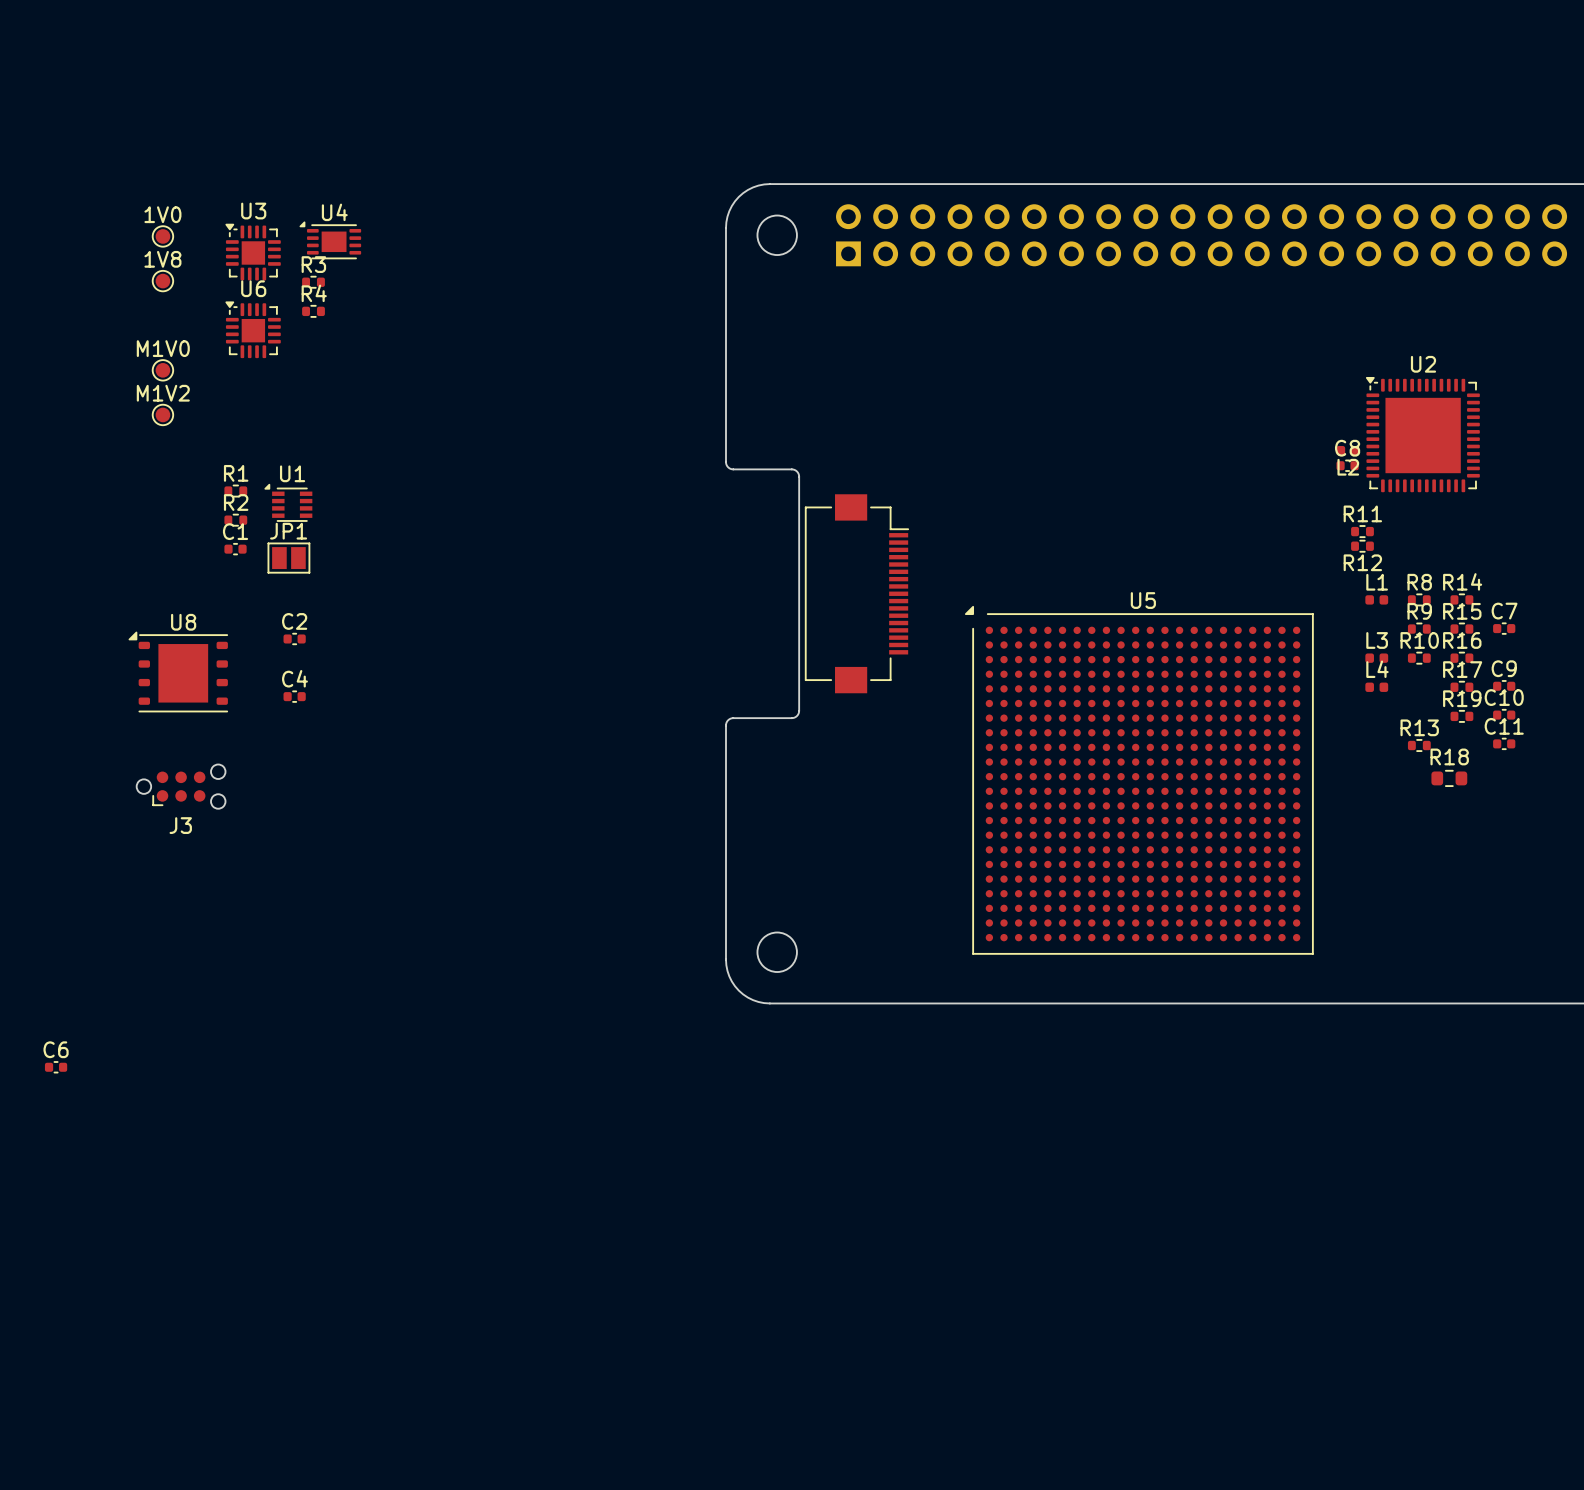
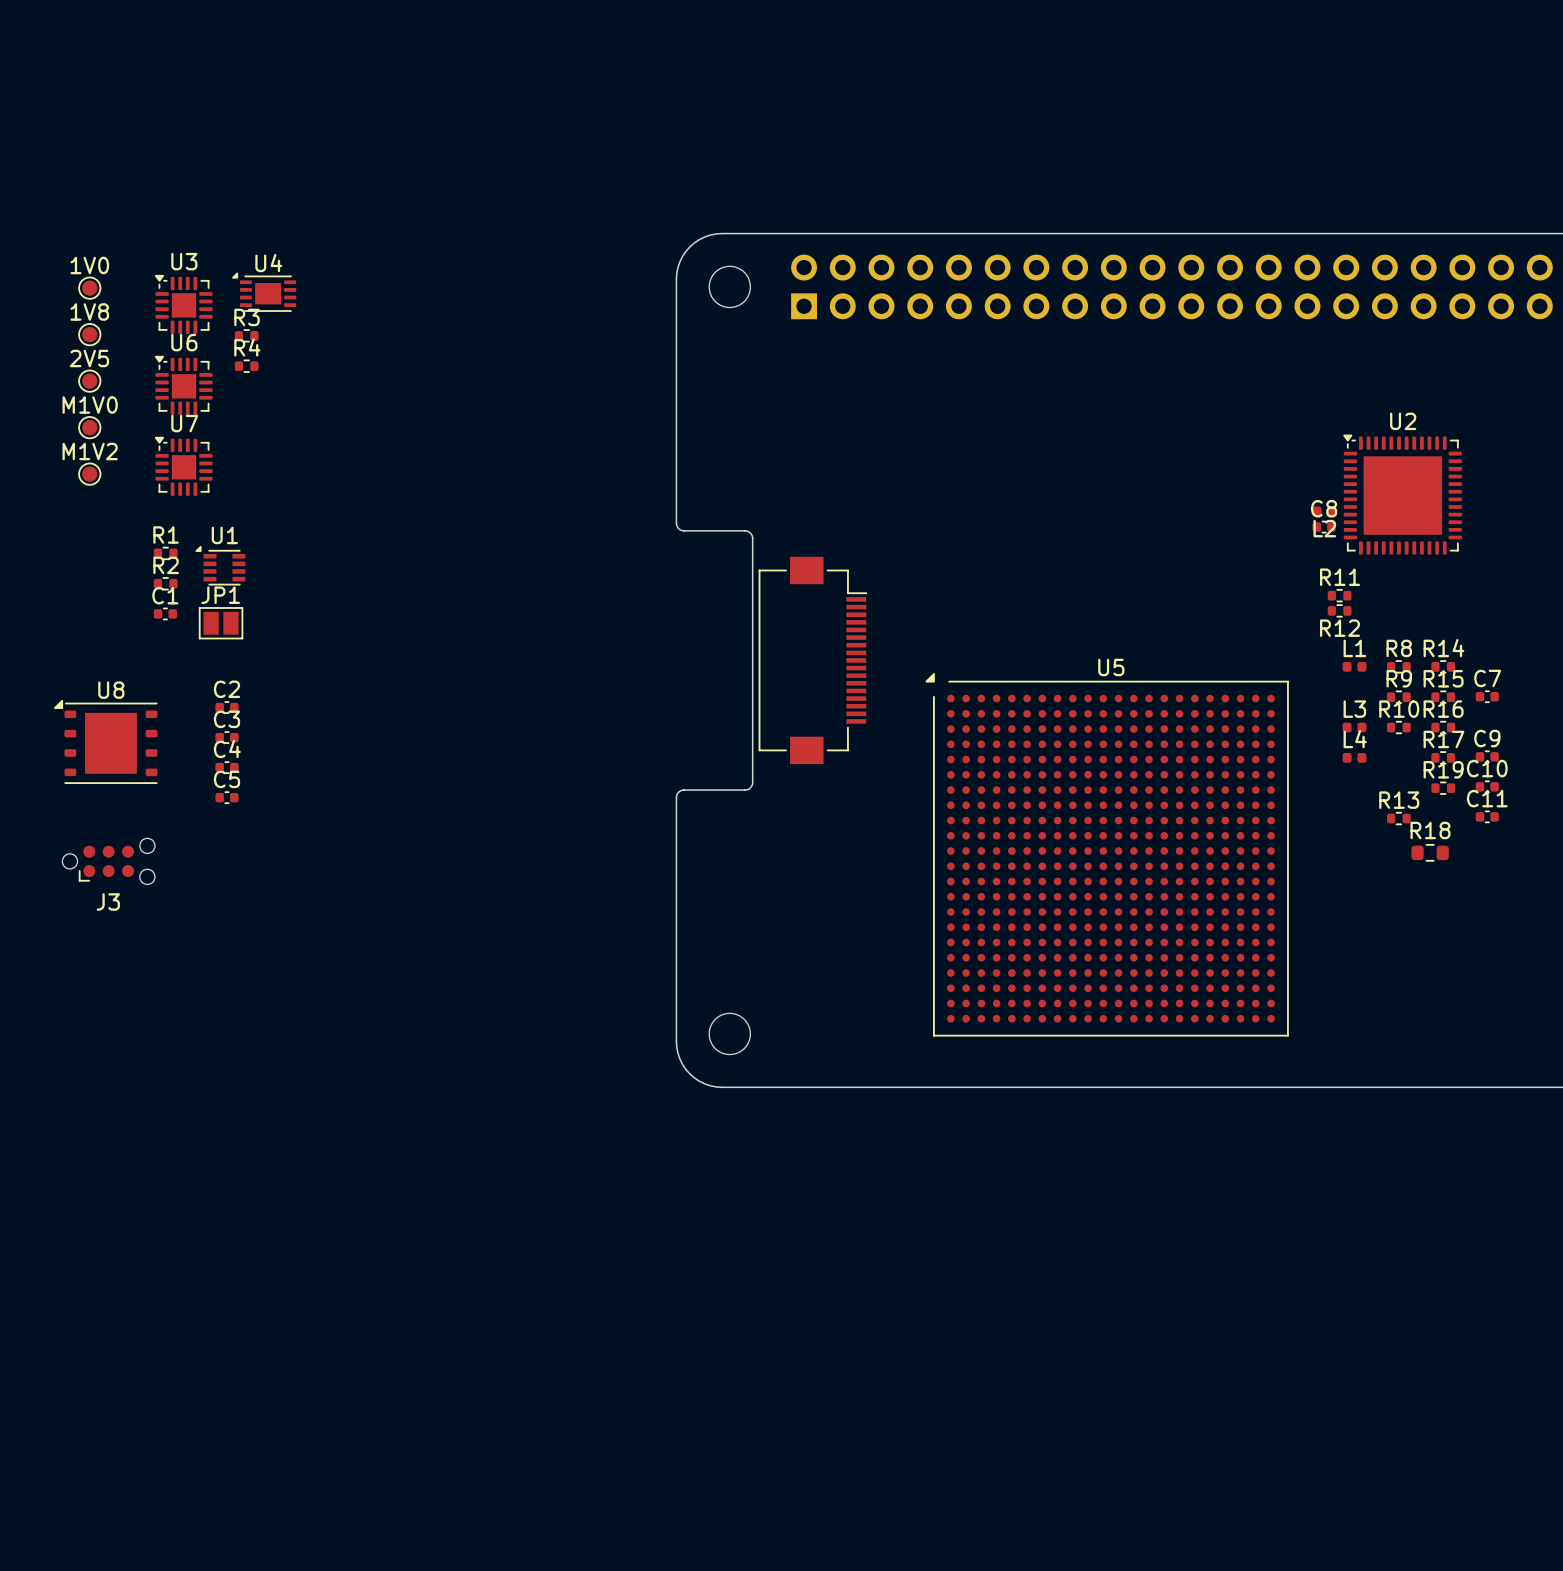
2V5: none -> (89, 381)
U7: none -> (183, 466)
C3: none -> (226, 737)
C5: none -> (226, 797)

